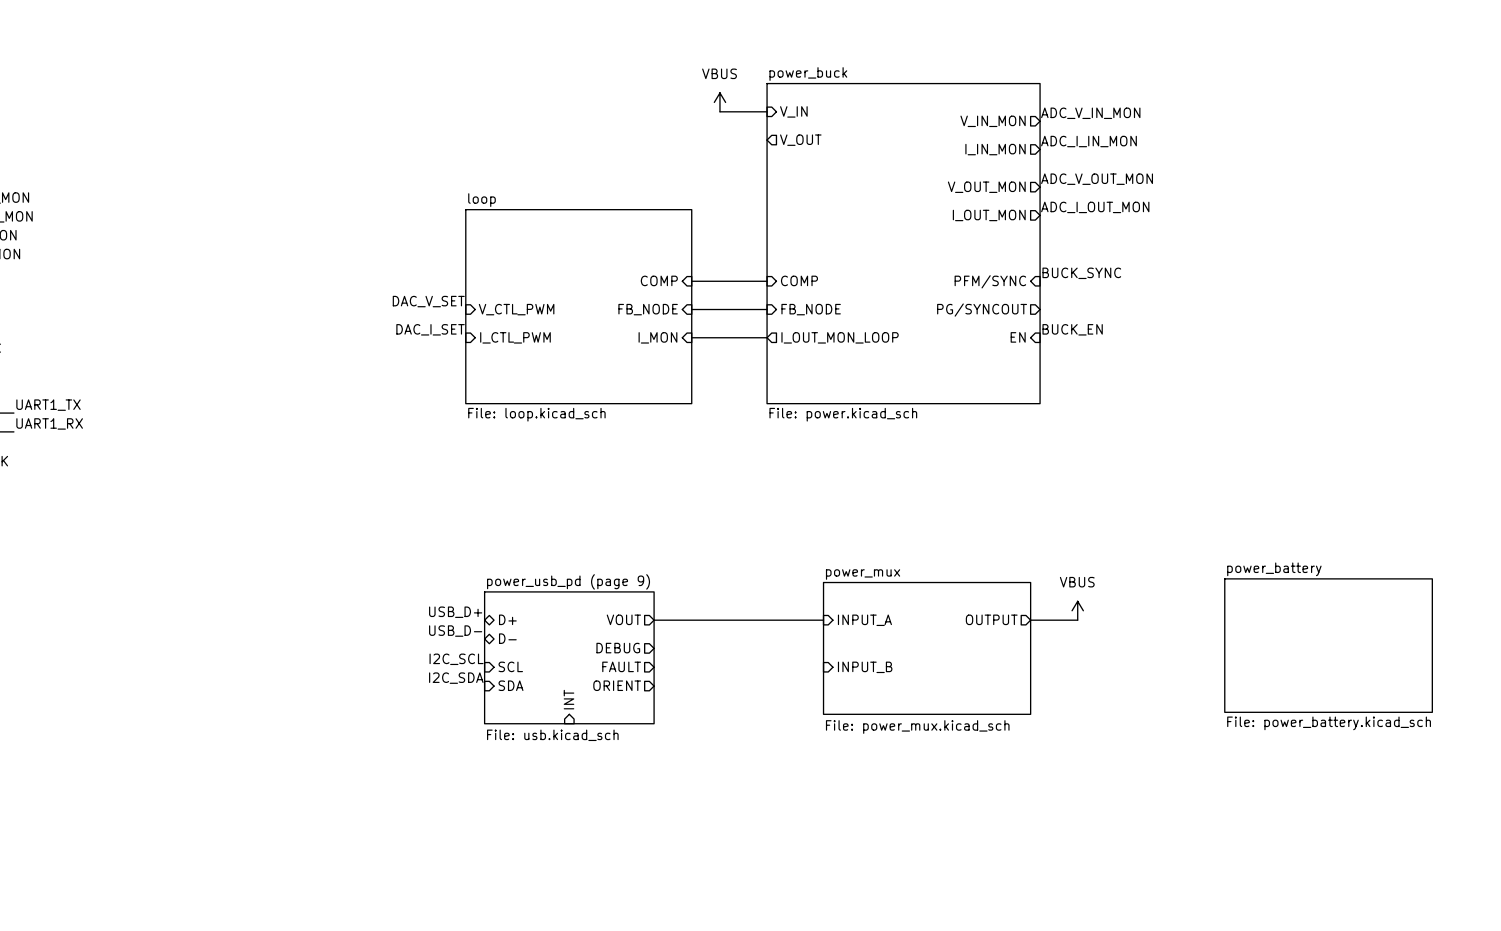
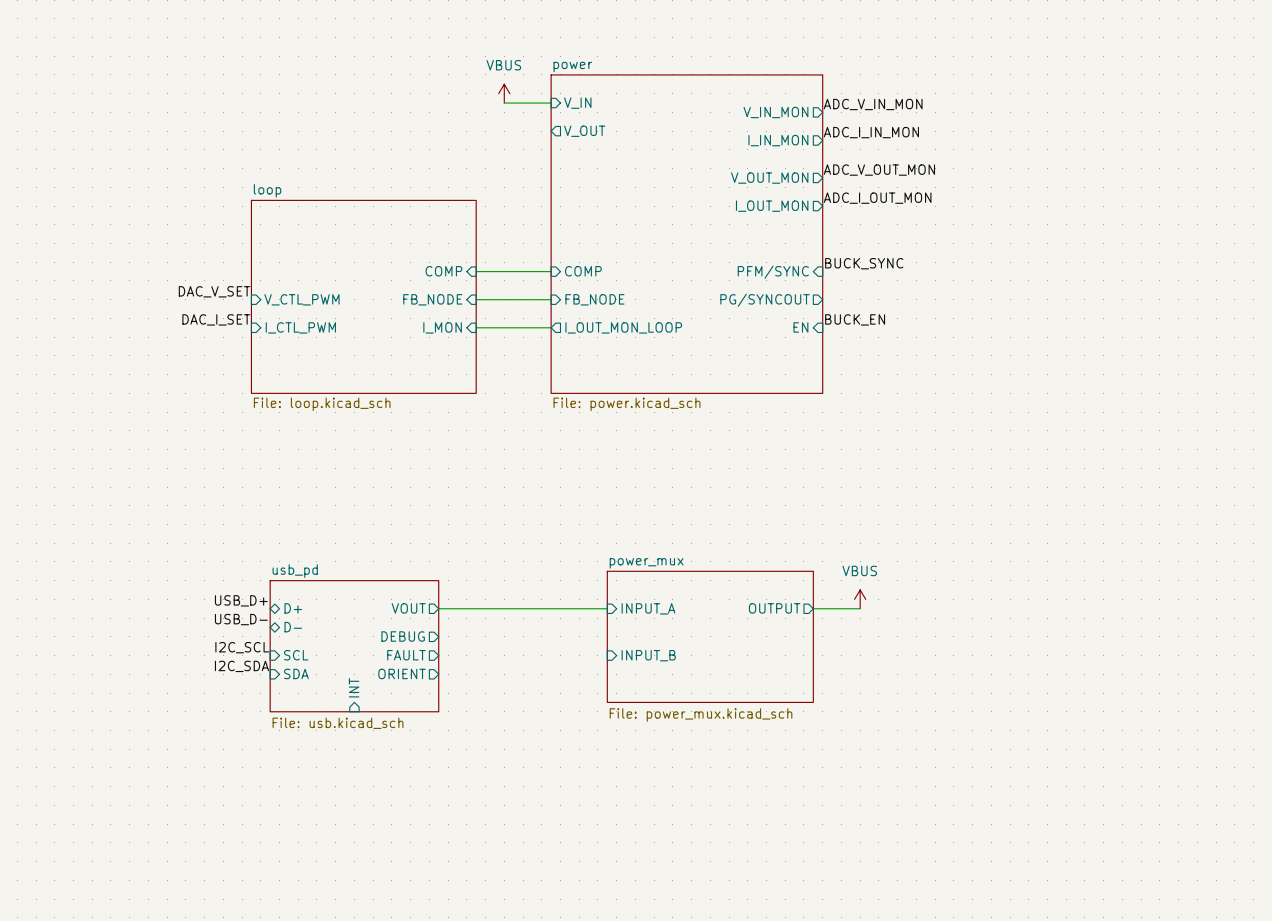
sheet power_buck name: power_buck (808, 74) -> power (572, 66)
sheet power_usb_pd (page 9) name: power_usb_pd (page 9) (568, 581) -> usb_pd (295, 571)
sheet power_battery: File: power_battery.kicad_sch (1328, 645) -> none

